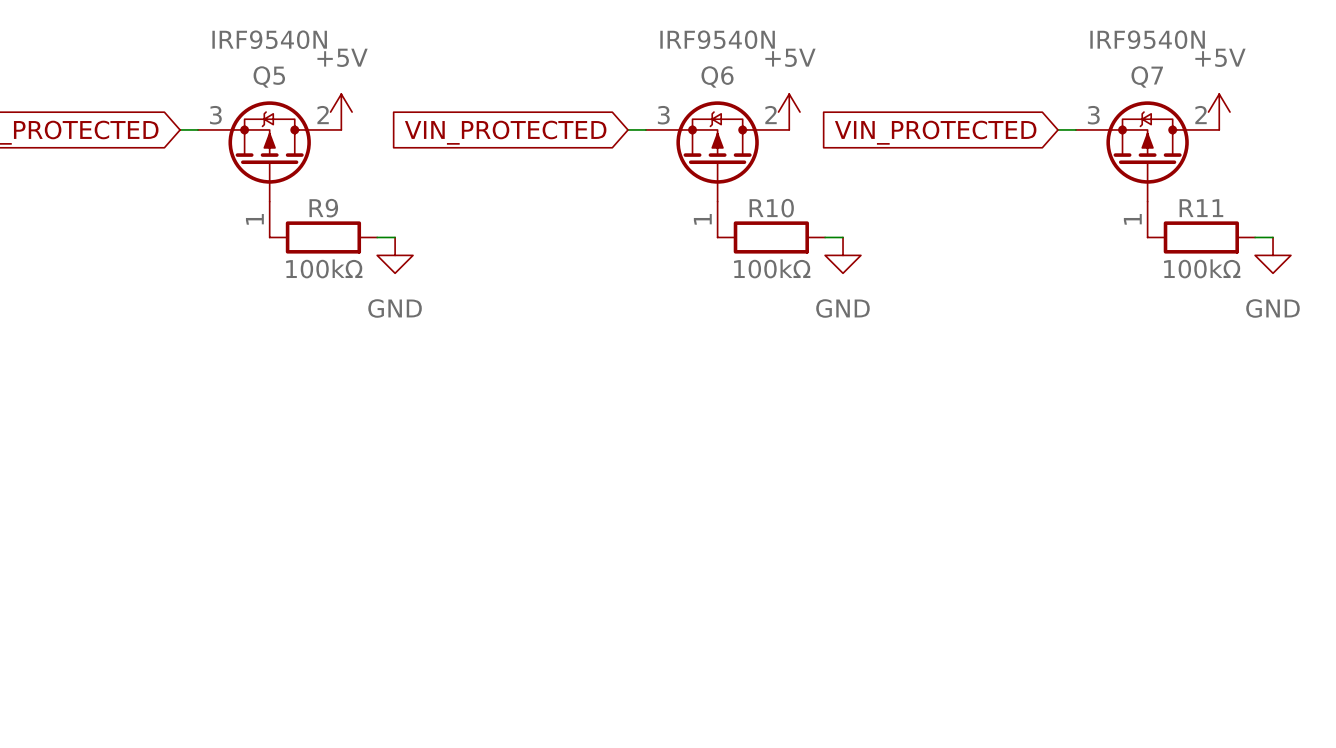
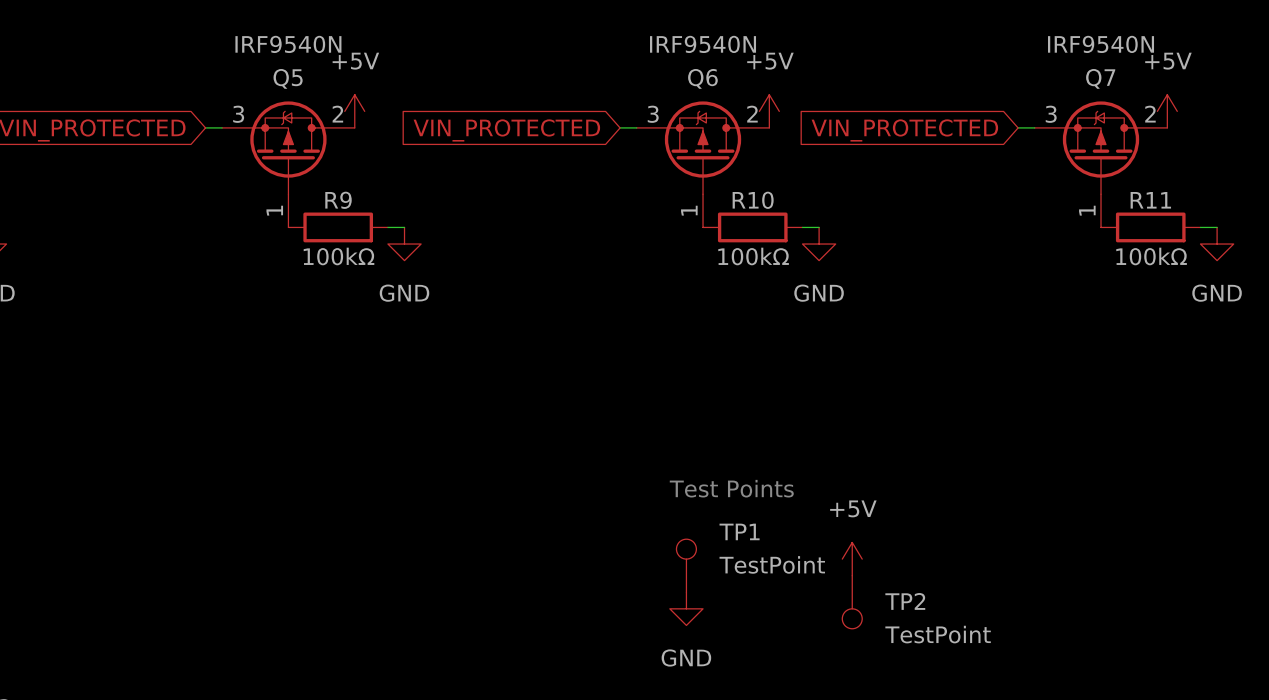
text: none -> Test Points (731, 488)
power symbol: none -> +5V (852, 559)
TP1: none -> TestPoint (686, 565)
TP2: none -> TestPoint (852, 602)
power symbol: none -> GND (686, 608)

